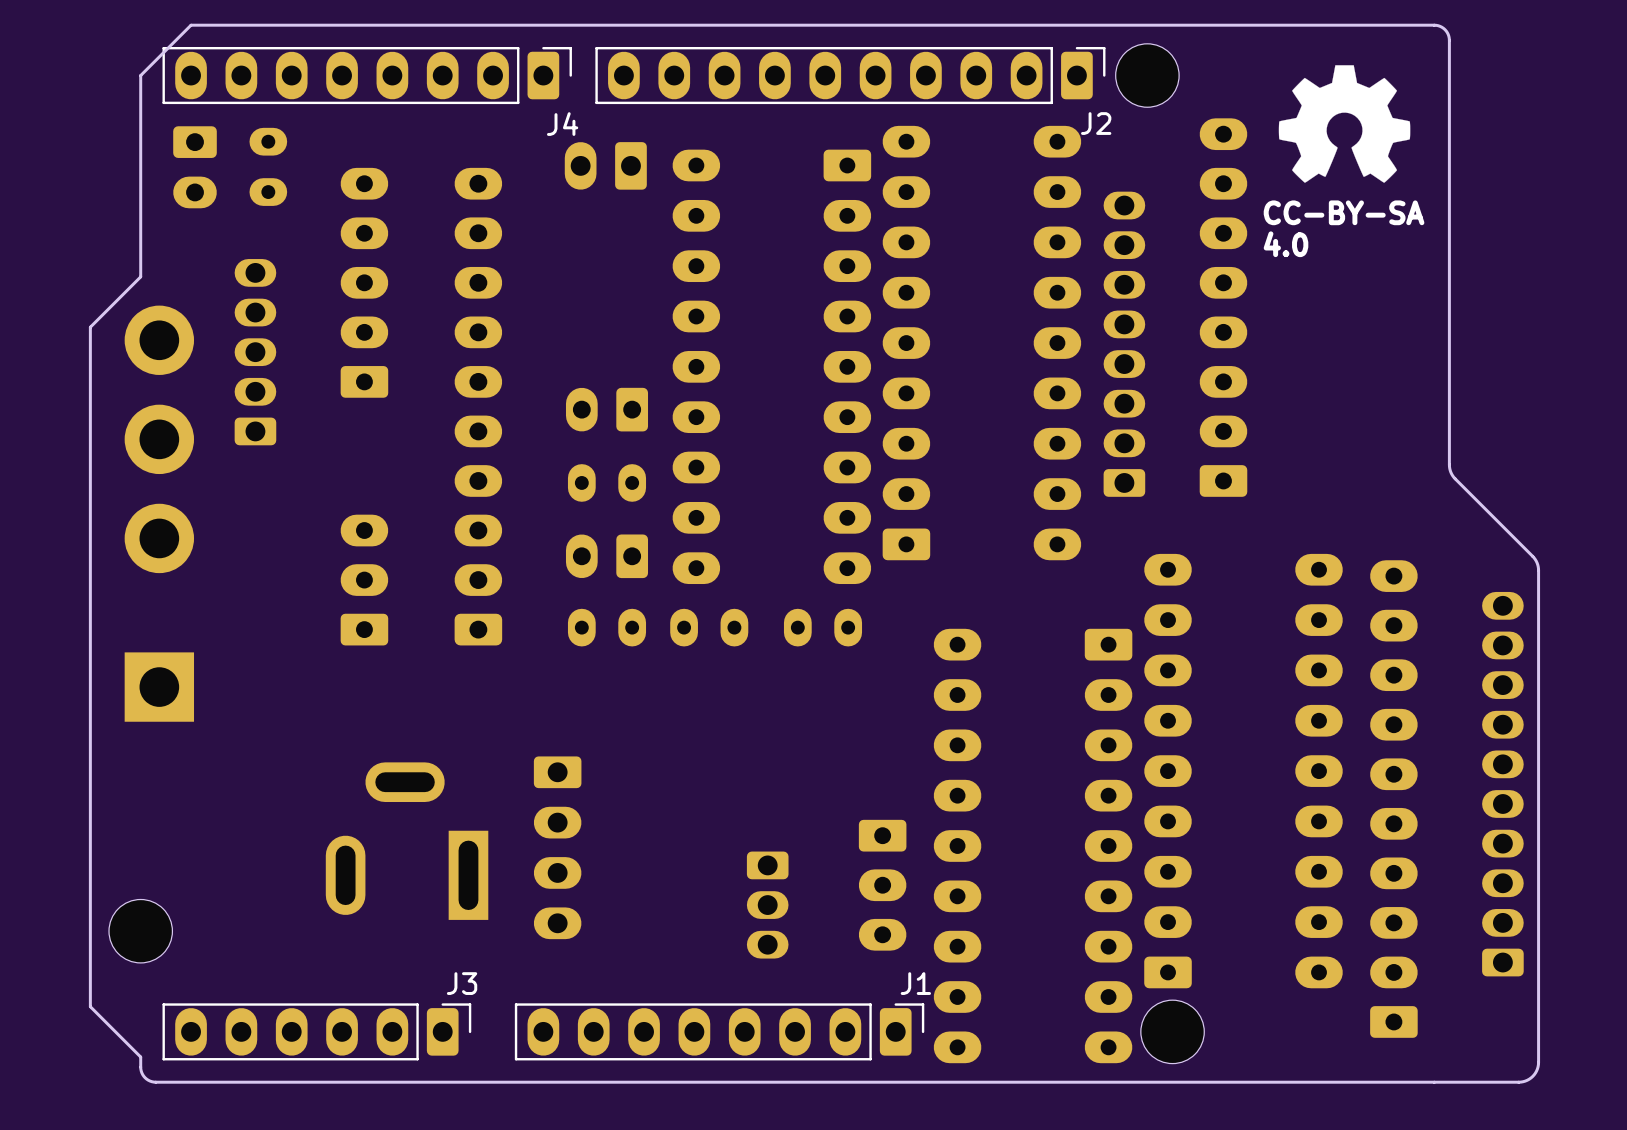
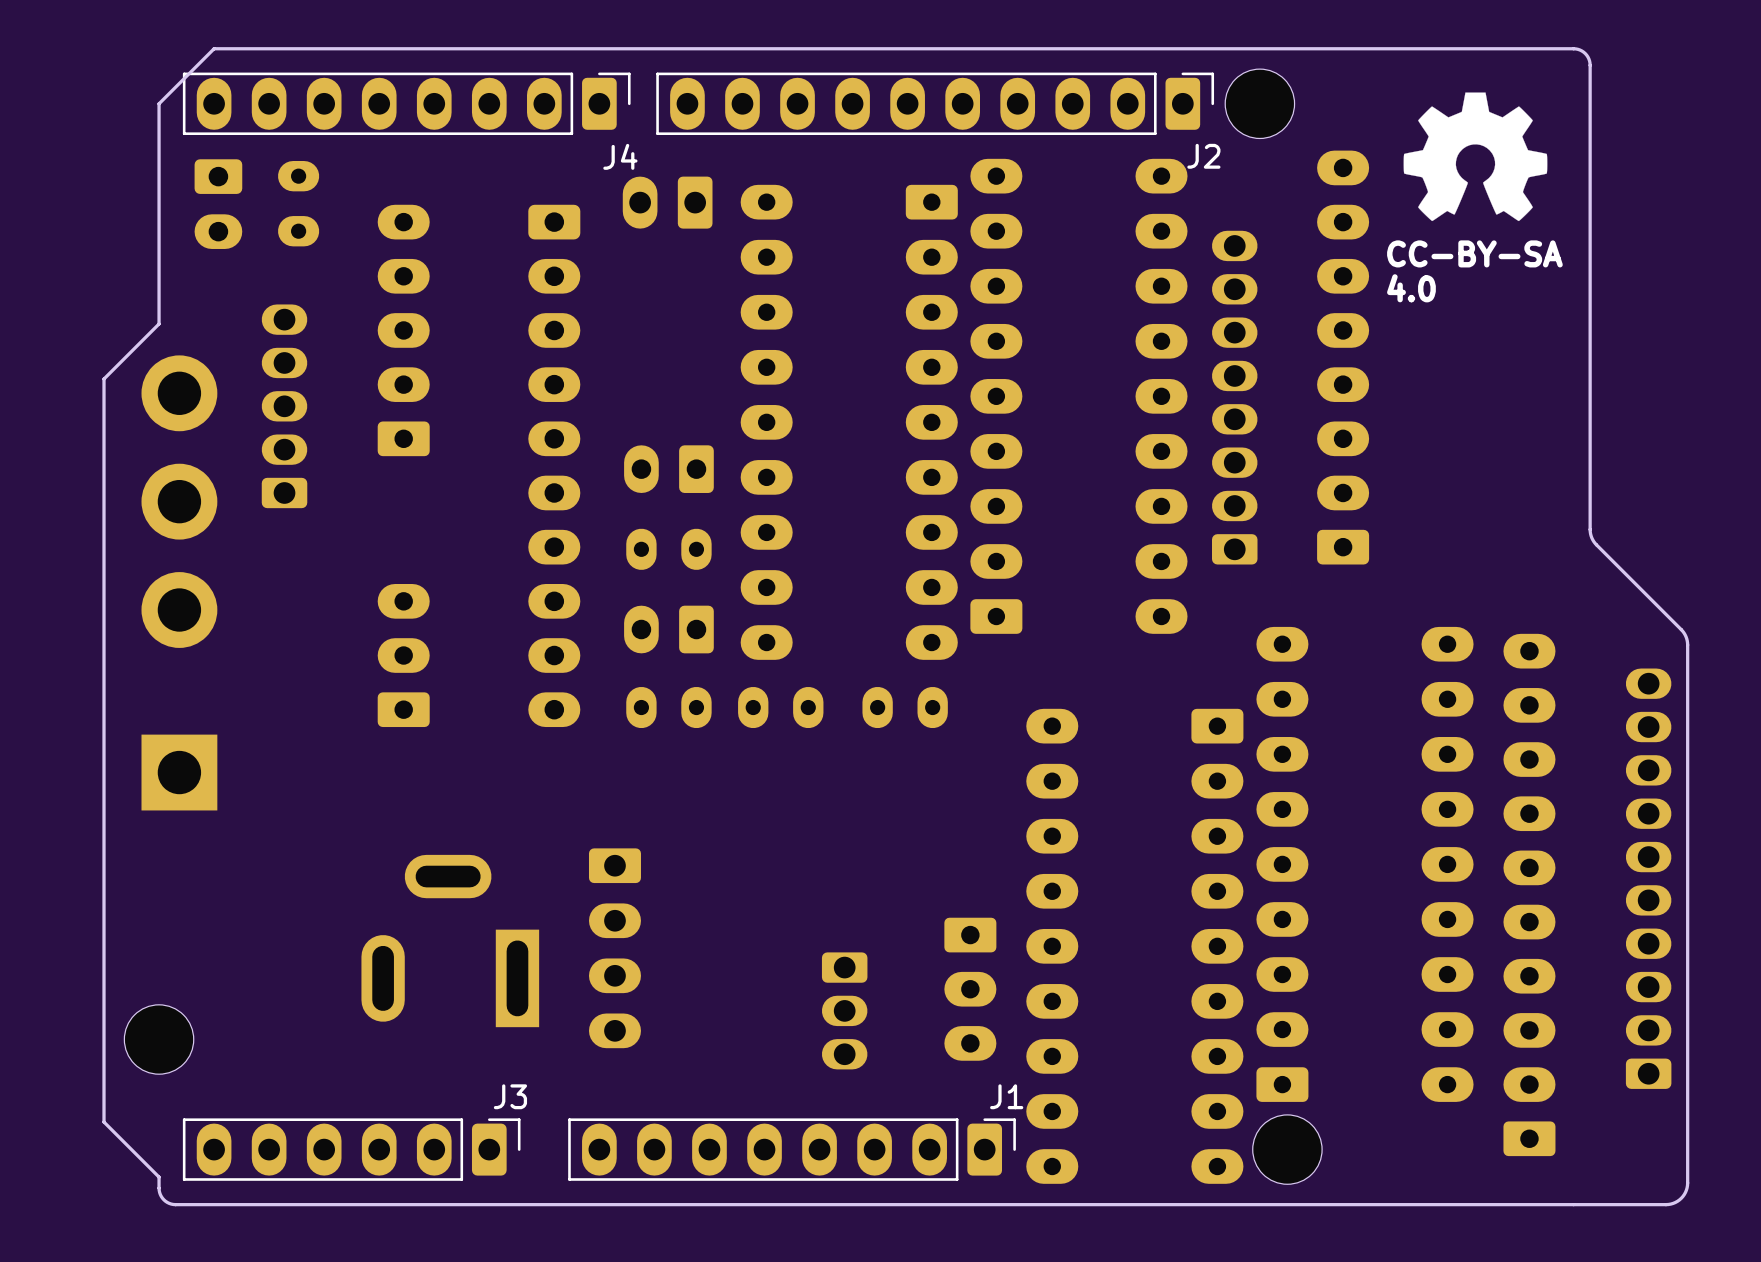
part rotation: 0° (478, 406) -> 180° (554, 465)

